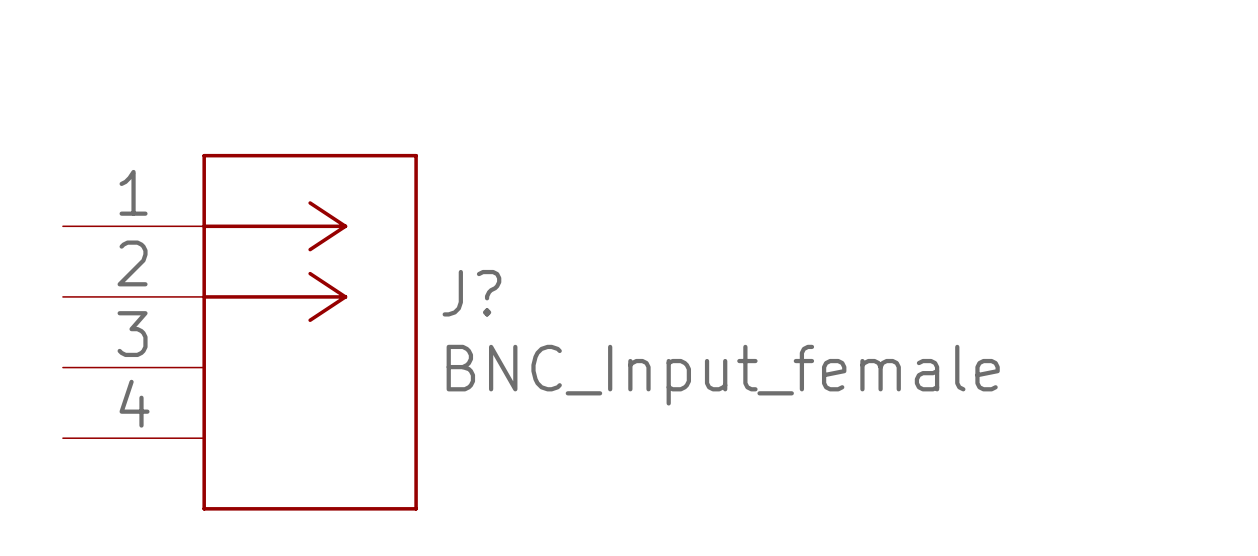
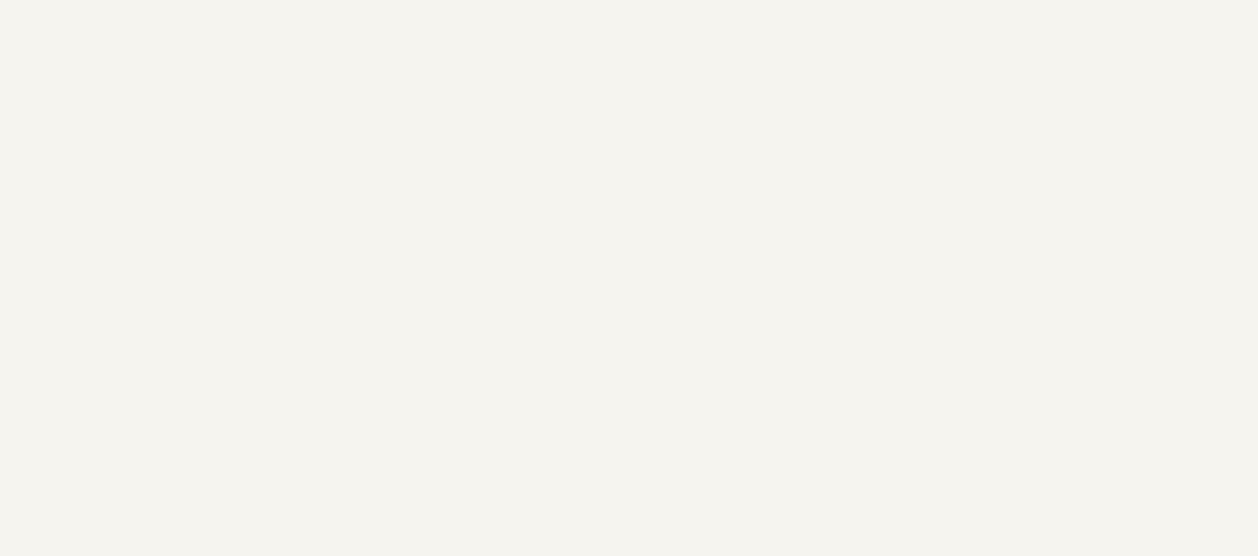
J?: BNC_Input_female (240, 332) -> none

